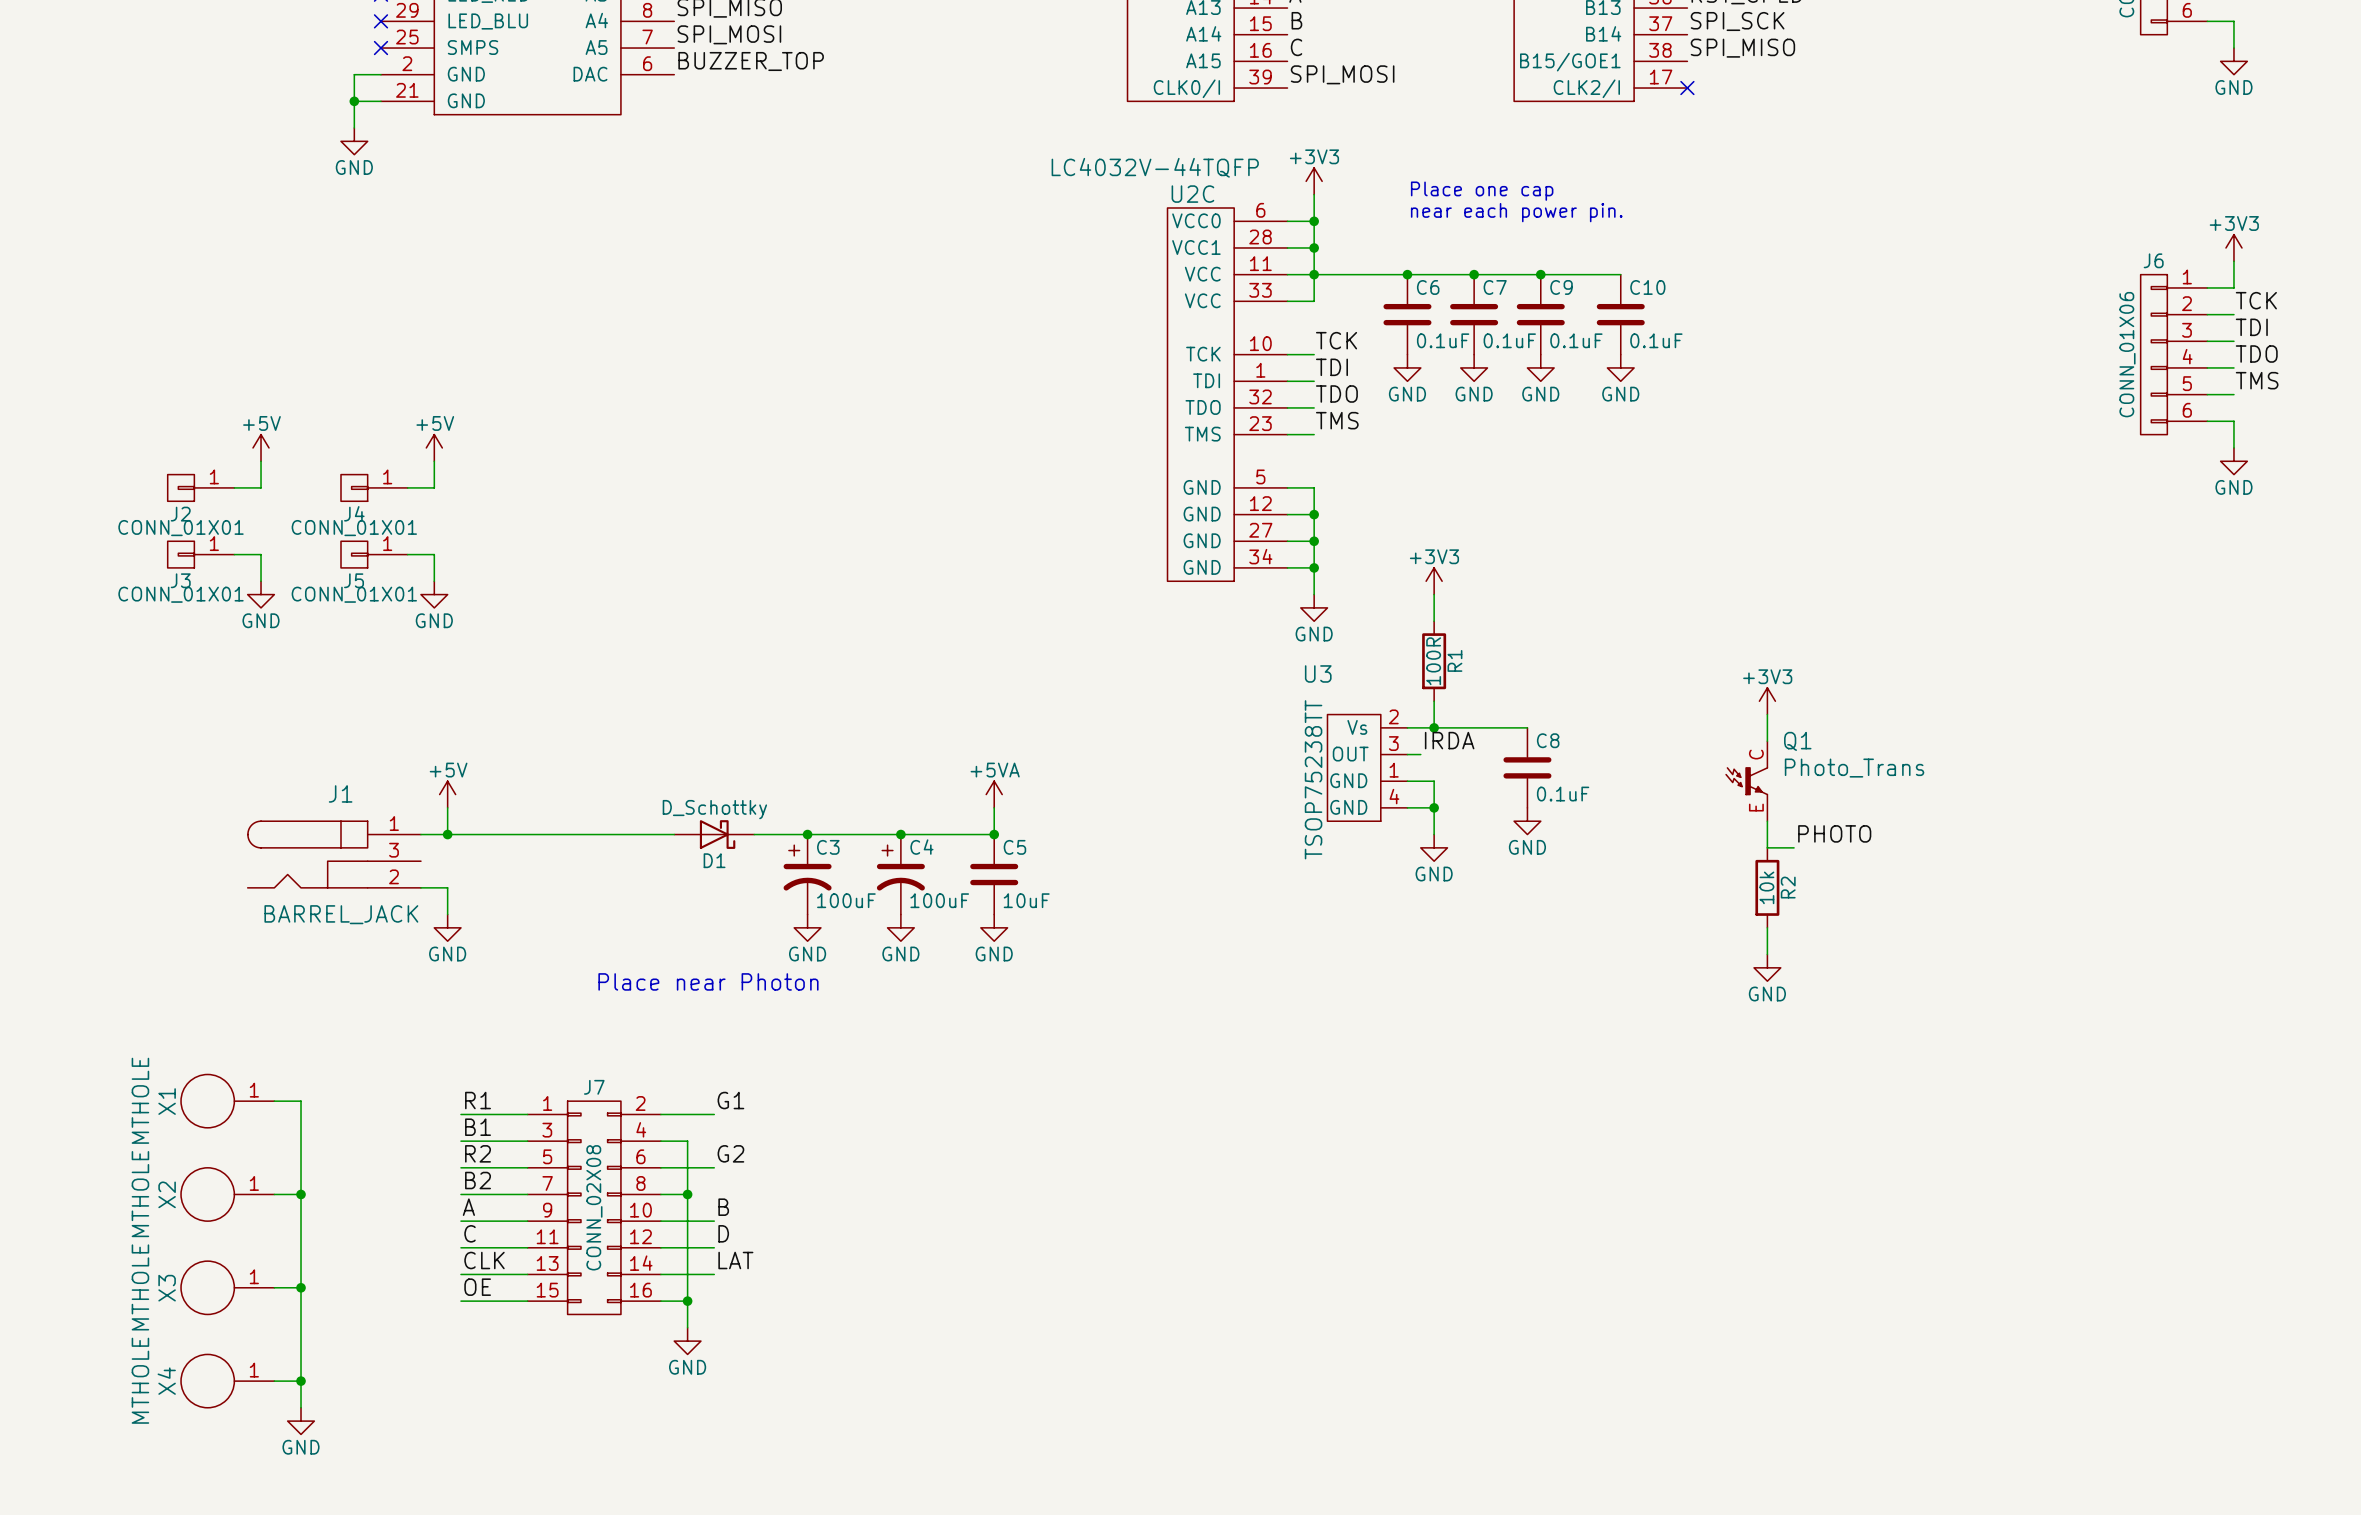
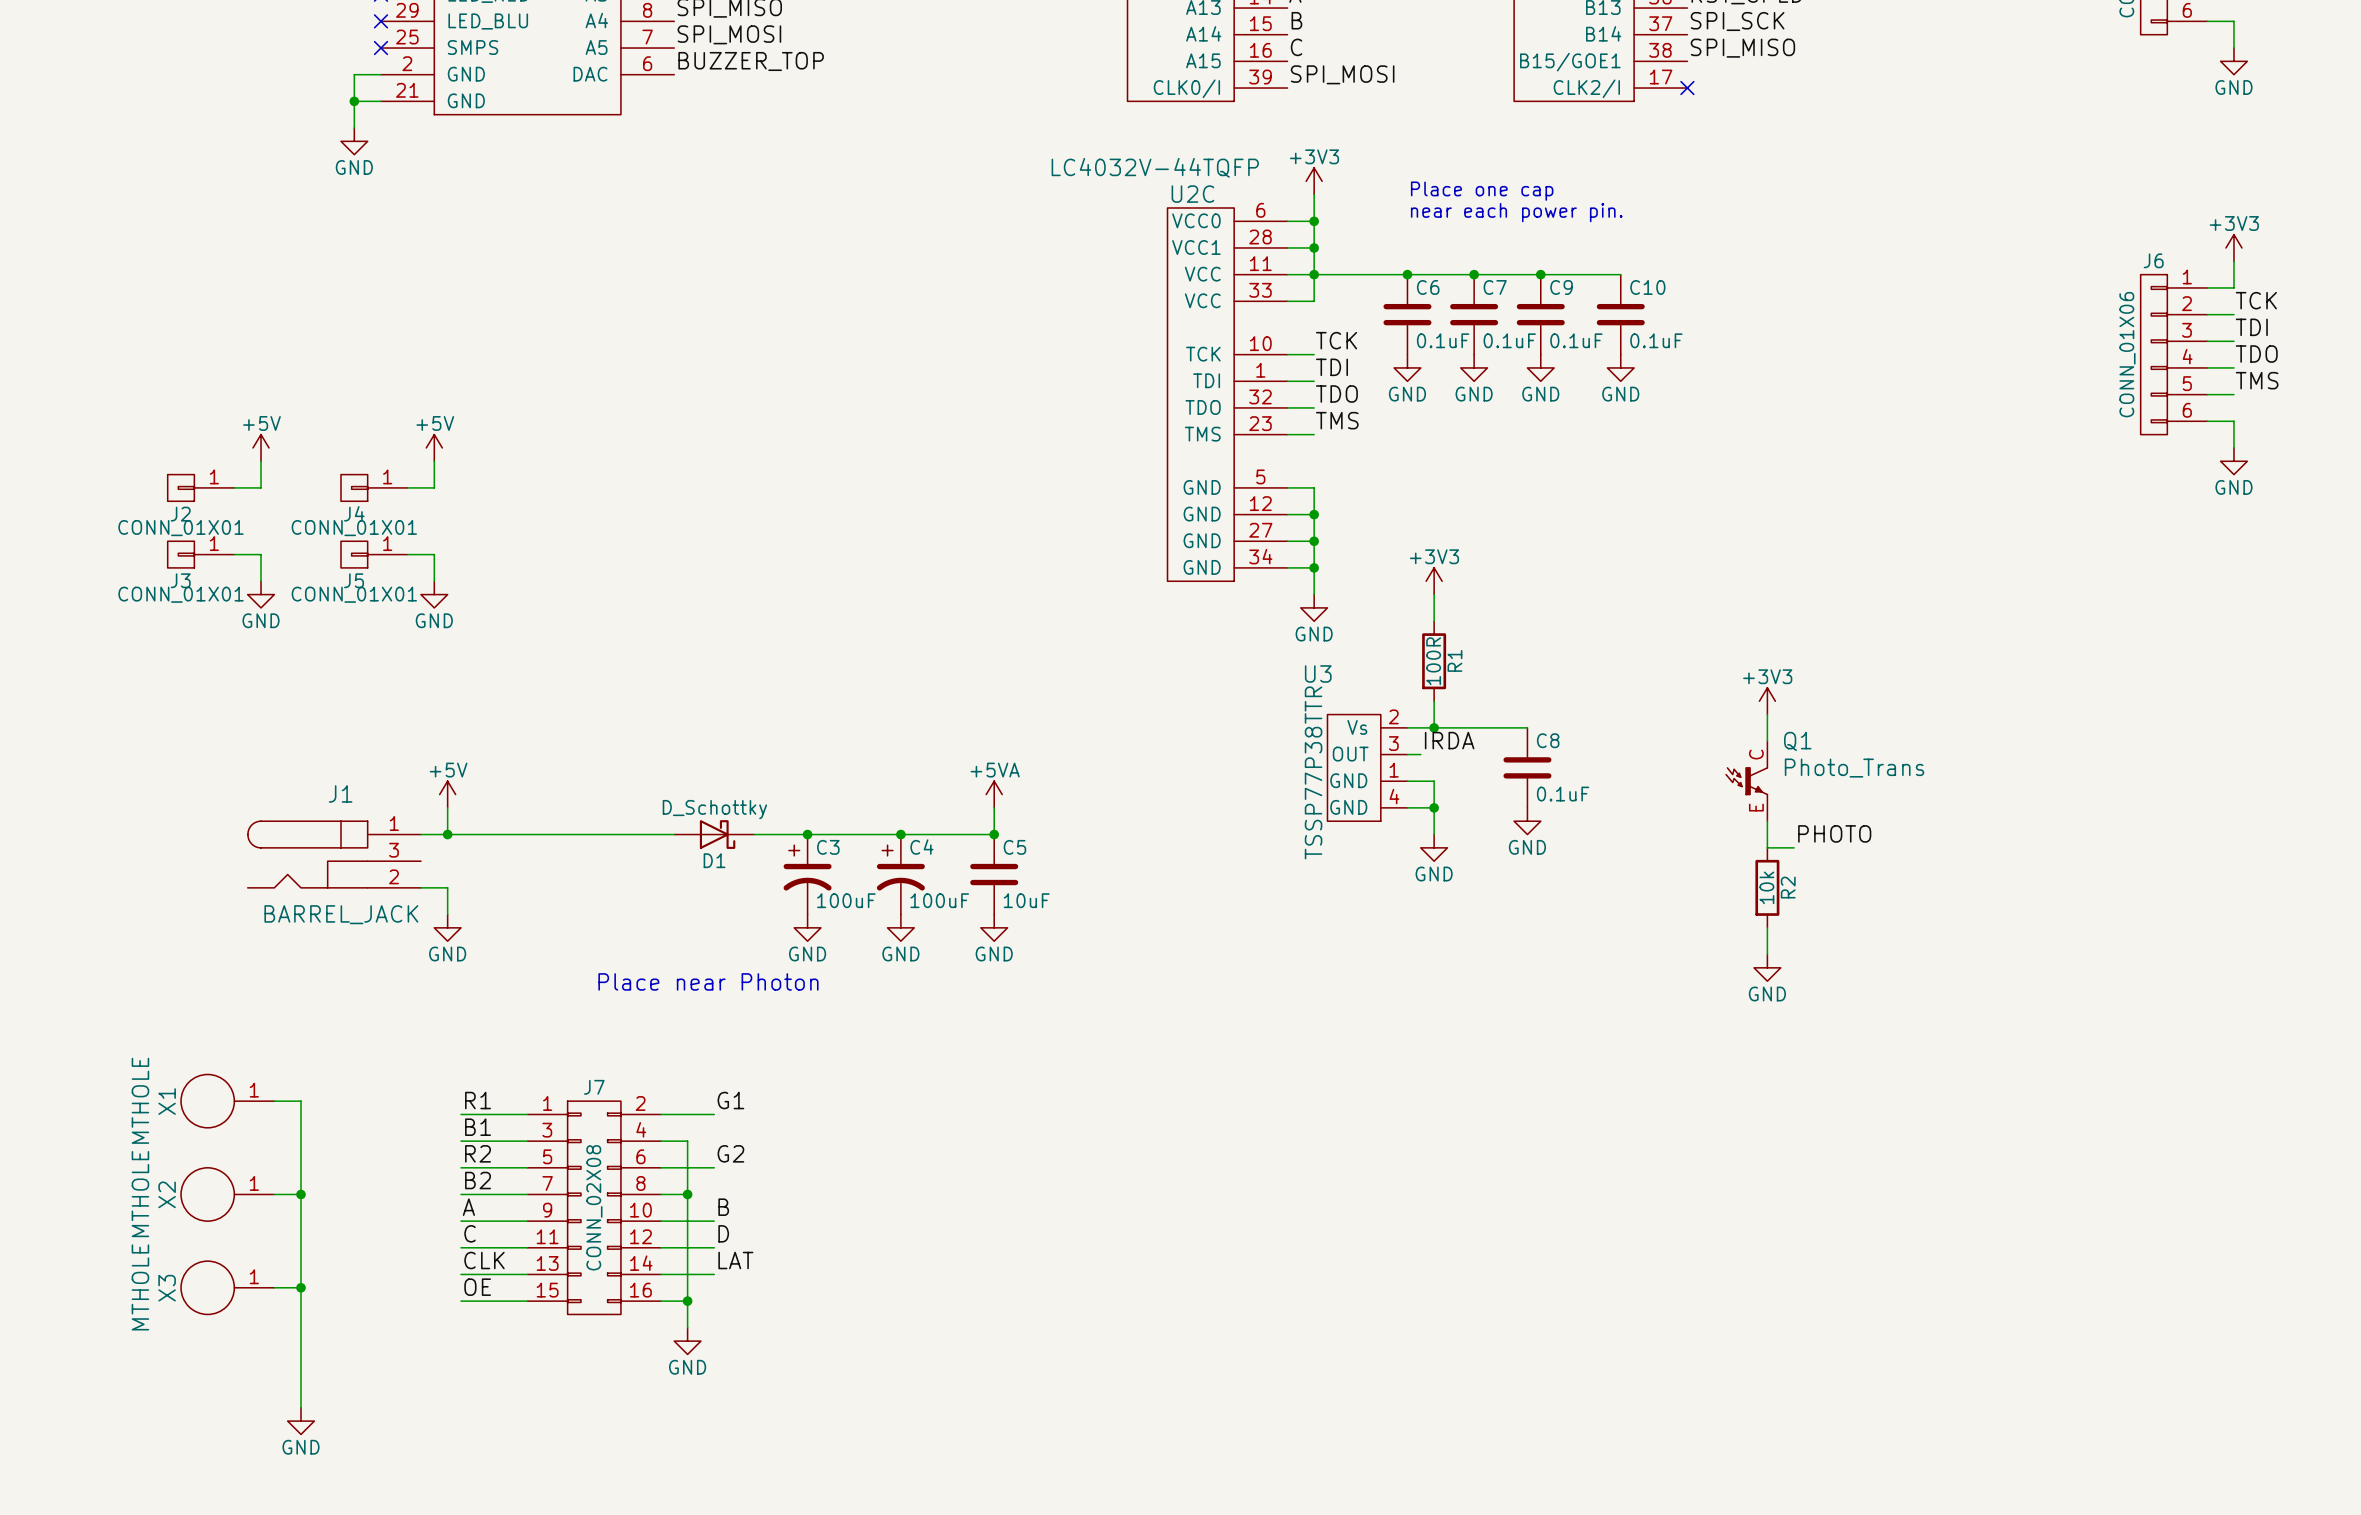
U3 value: TSOP75238TT (1313, 779) -> TSSP77P38TTR (1313, 772)
X4: MTHOLE (227, 1381) -> none
wire: (274, 1381) (301, 1381) -> none
junction: (301, 1381) -> none

